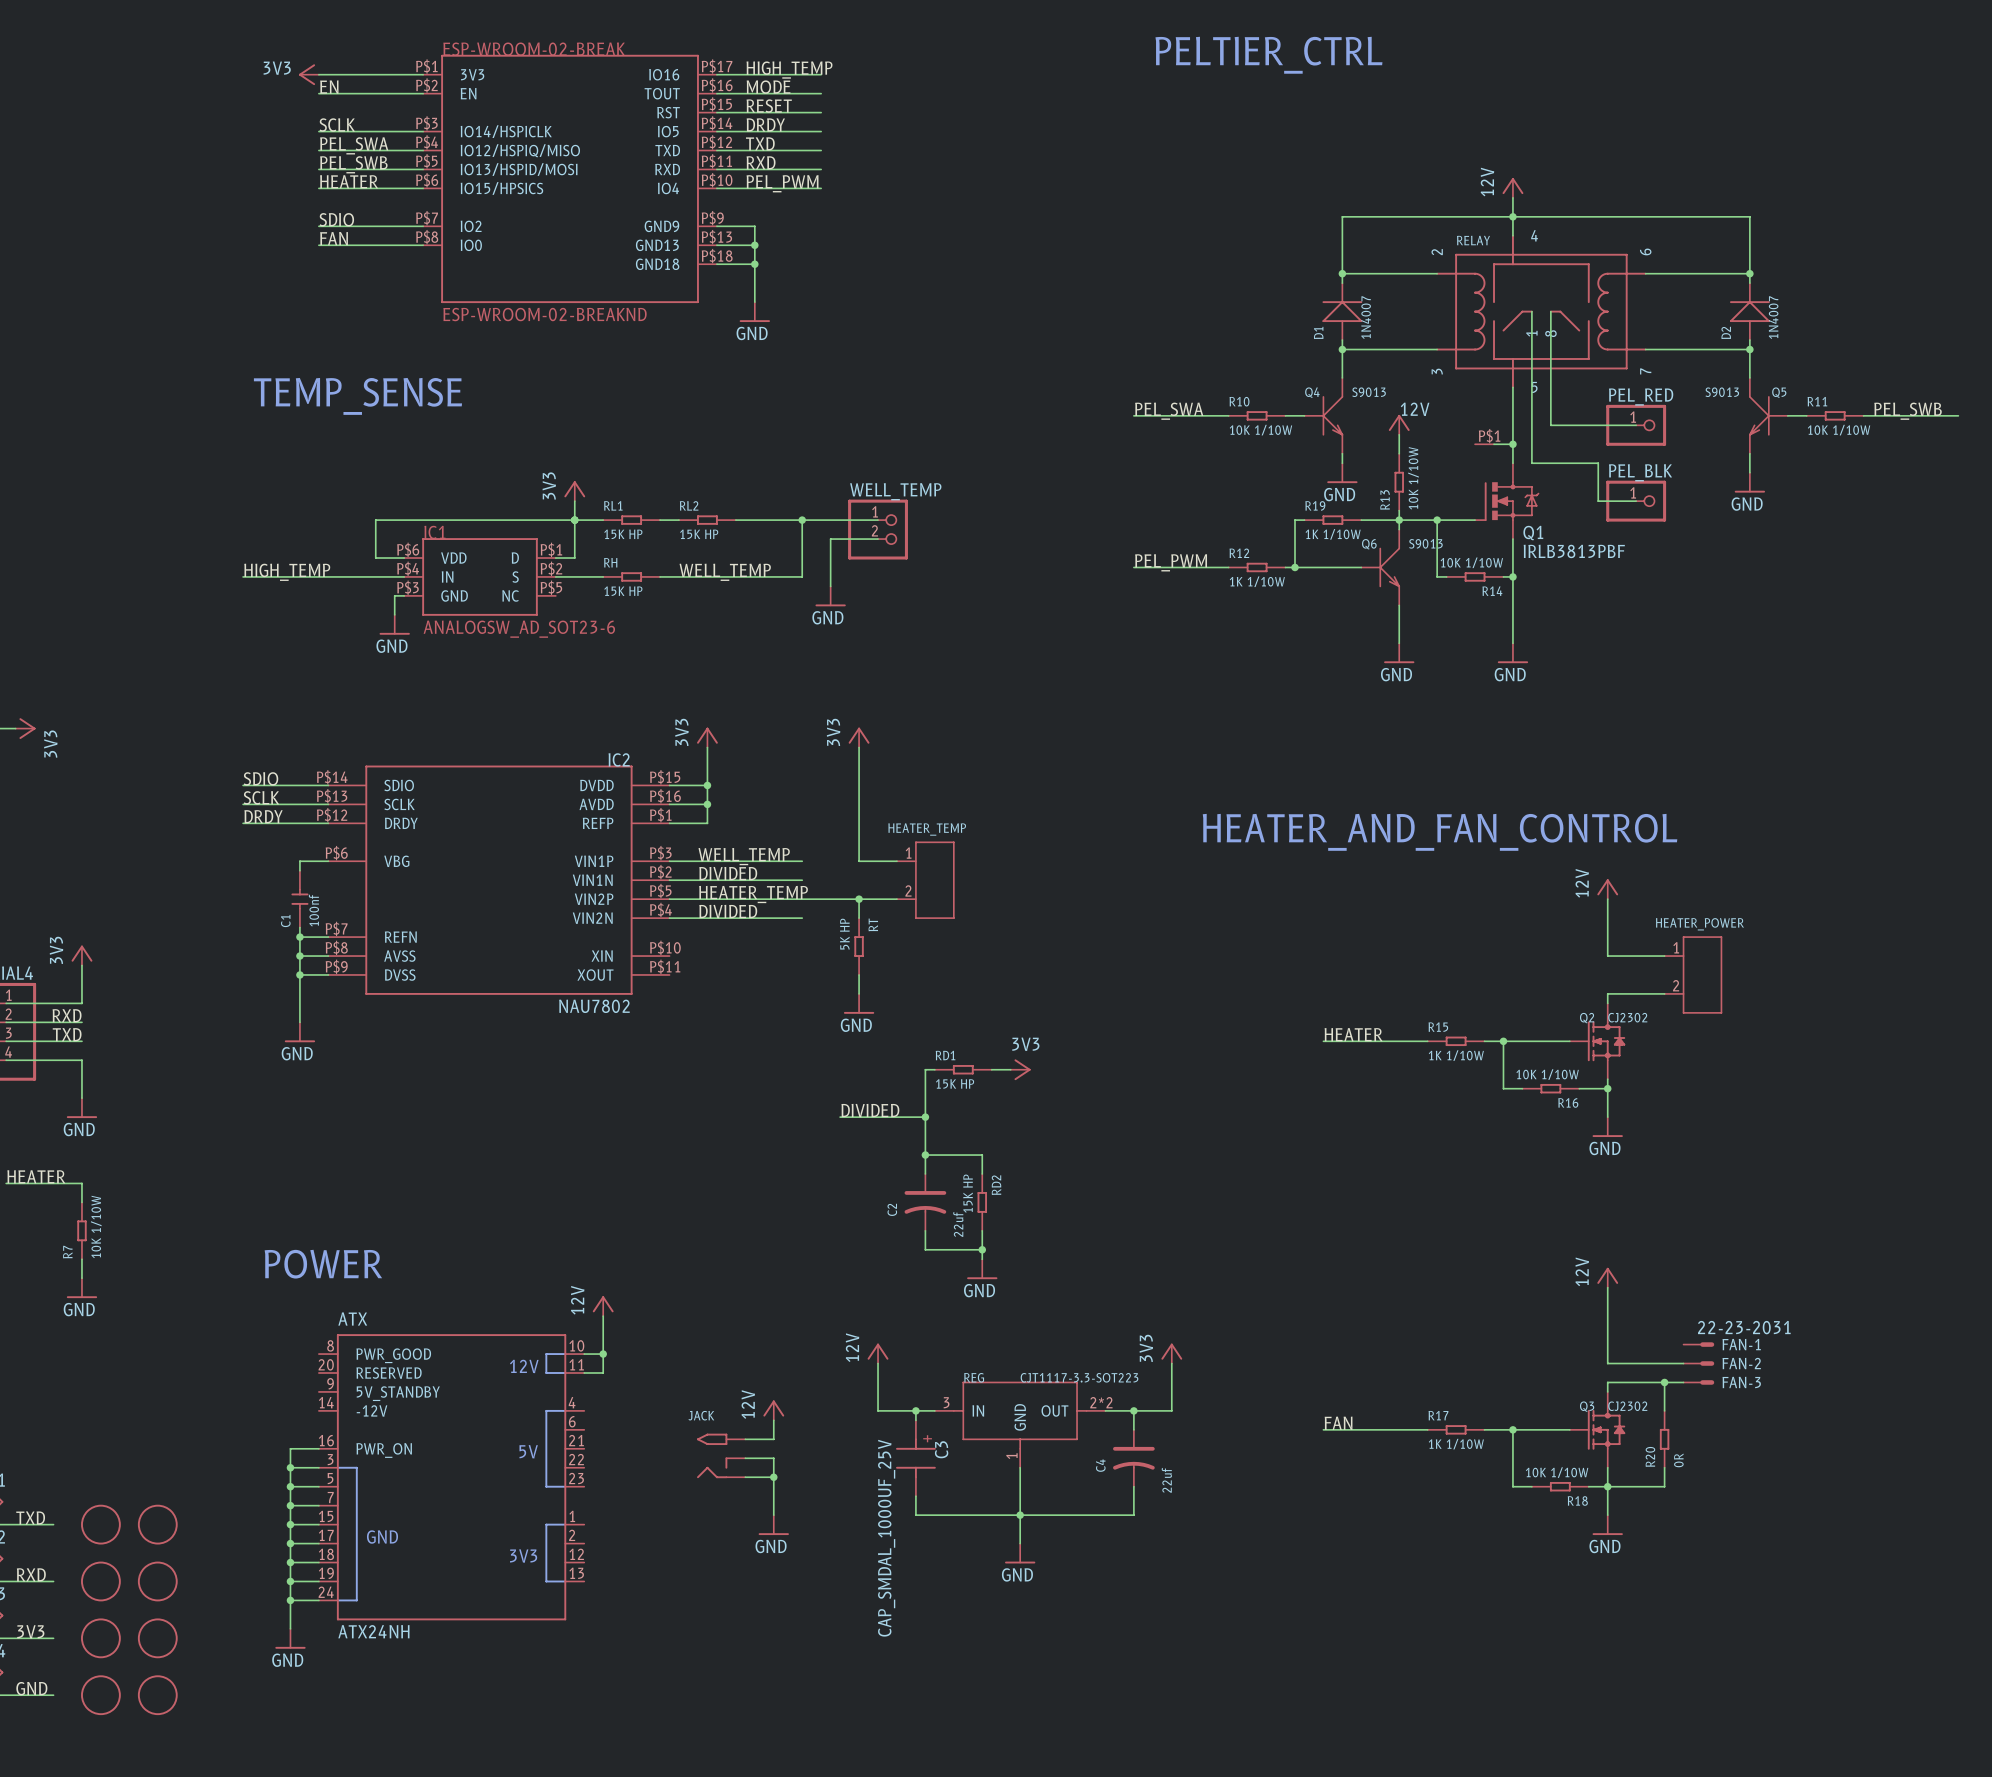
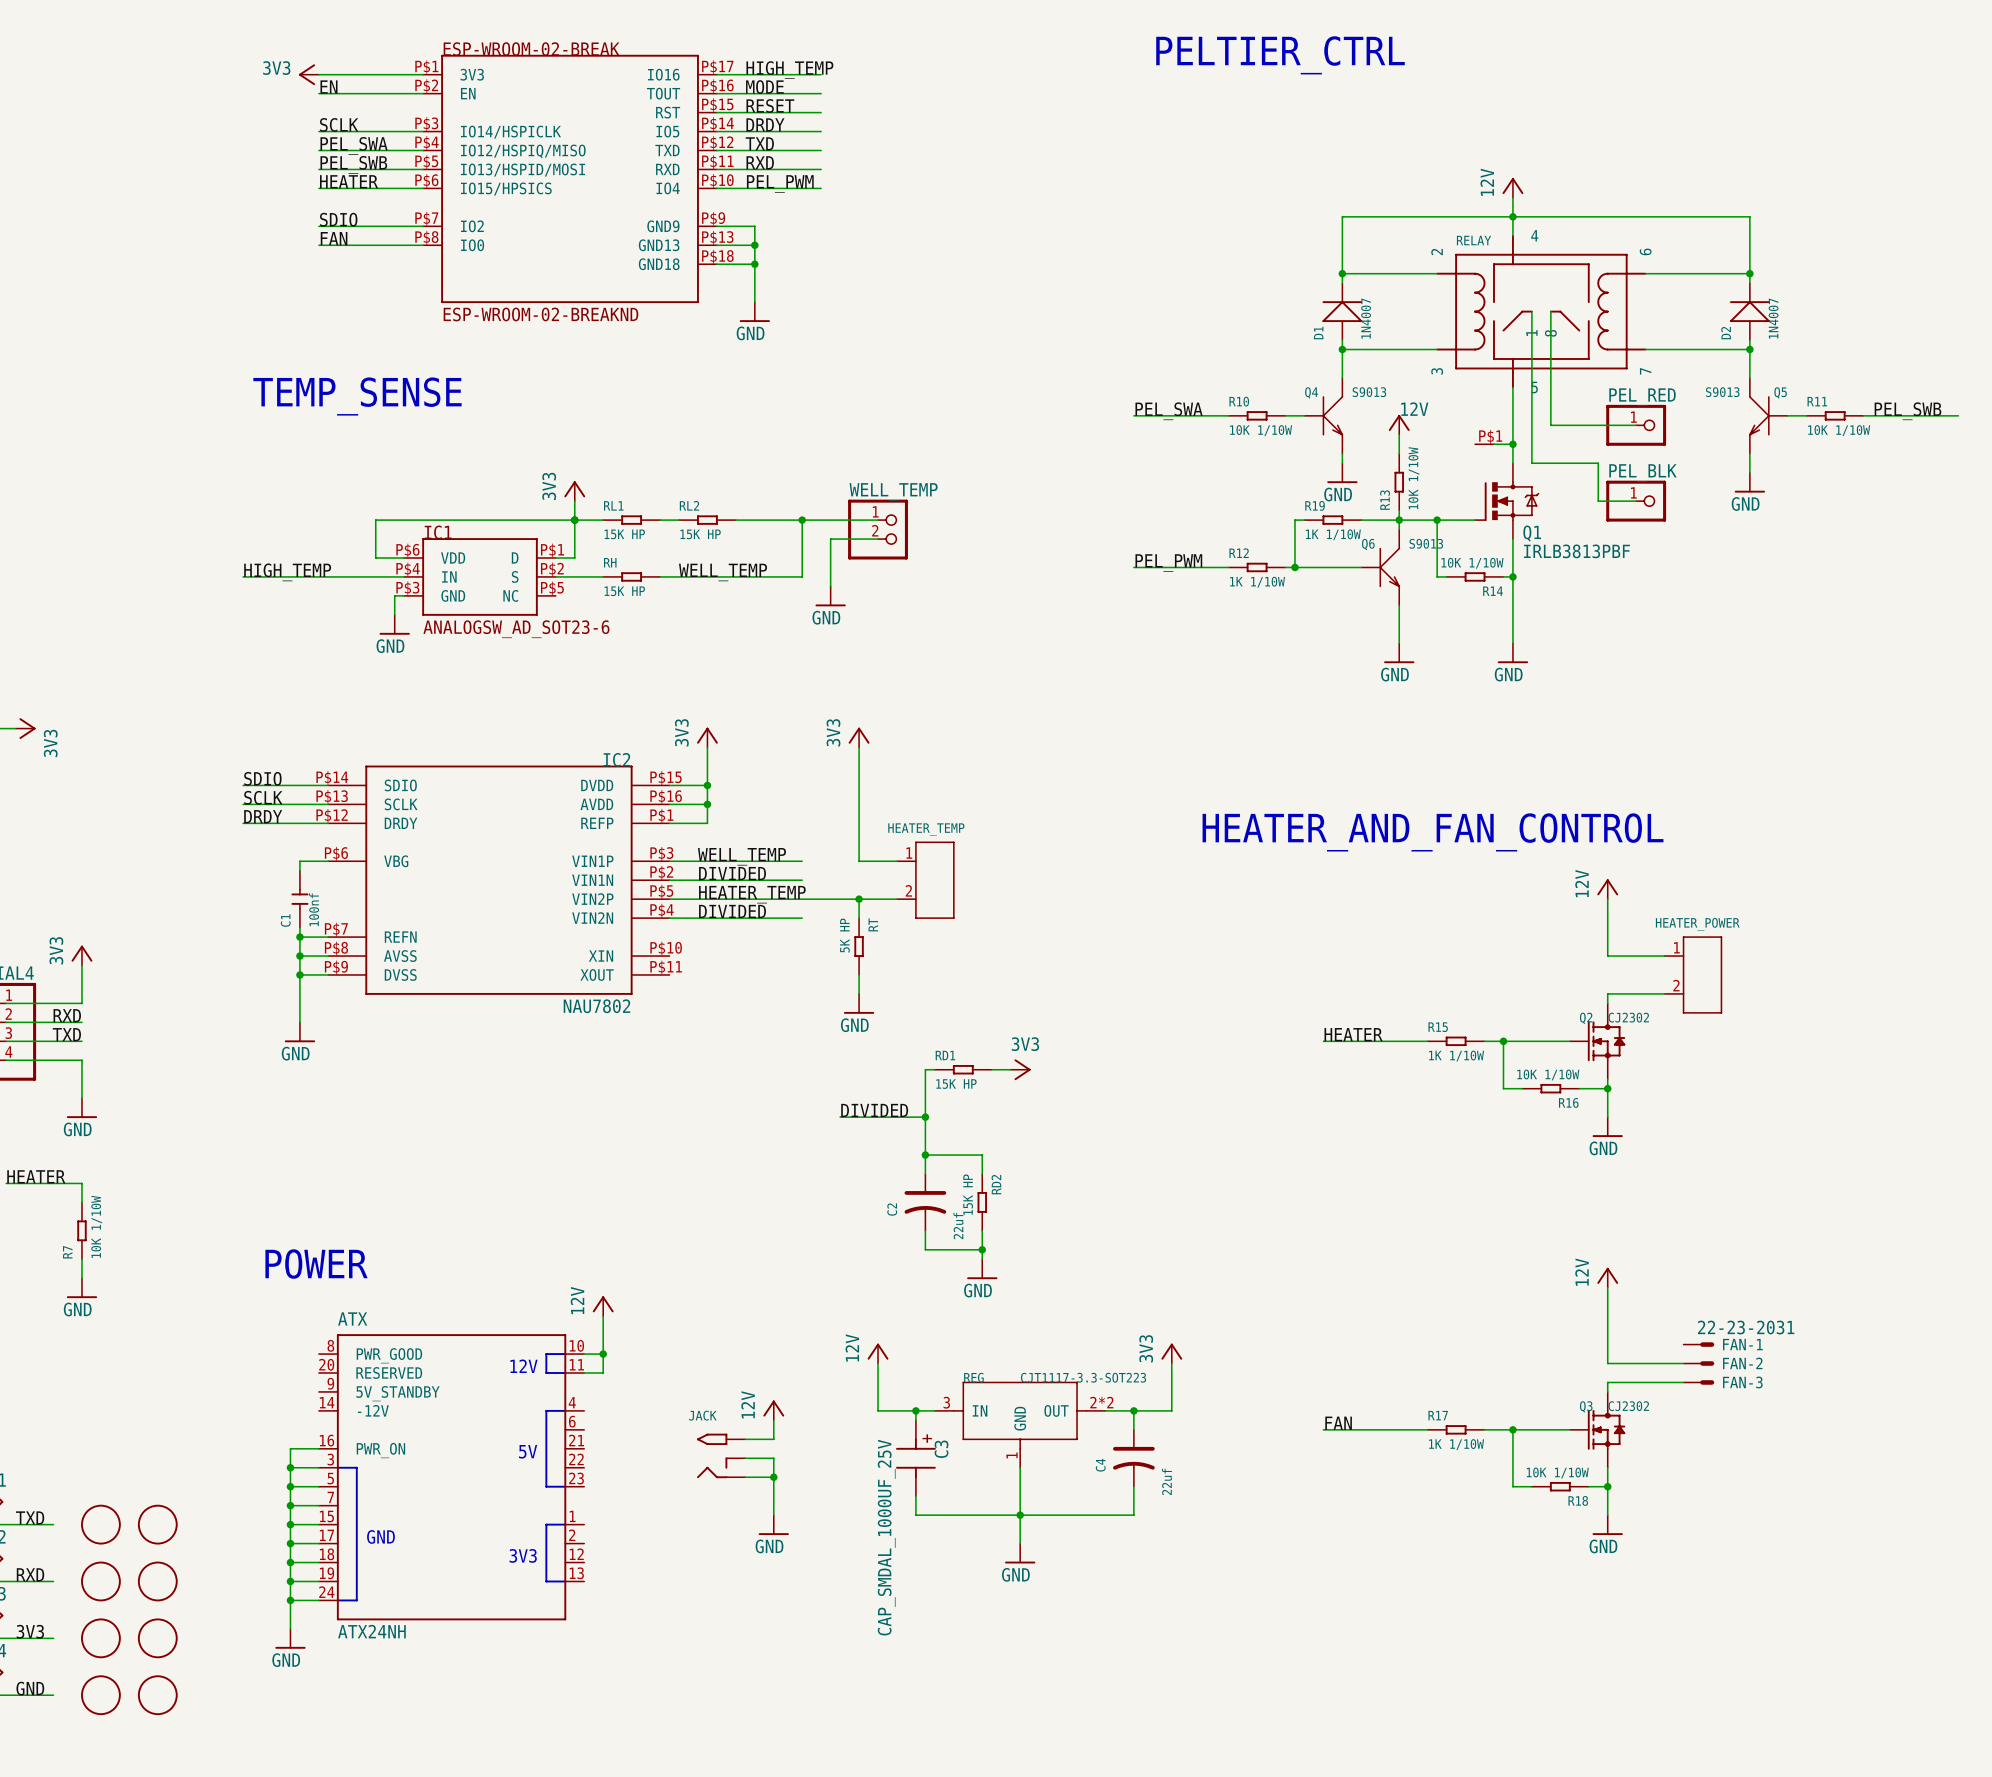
wire: (1664, 1382) (1664, 1410) -> none
junction: (1664, 1382) -> none
R20: 0R (1664, 1439) -> none
wire: (1664, 1467) (1664, 1486) (1607, 1486) -> none

